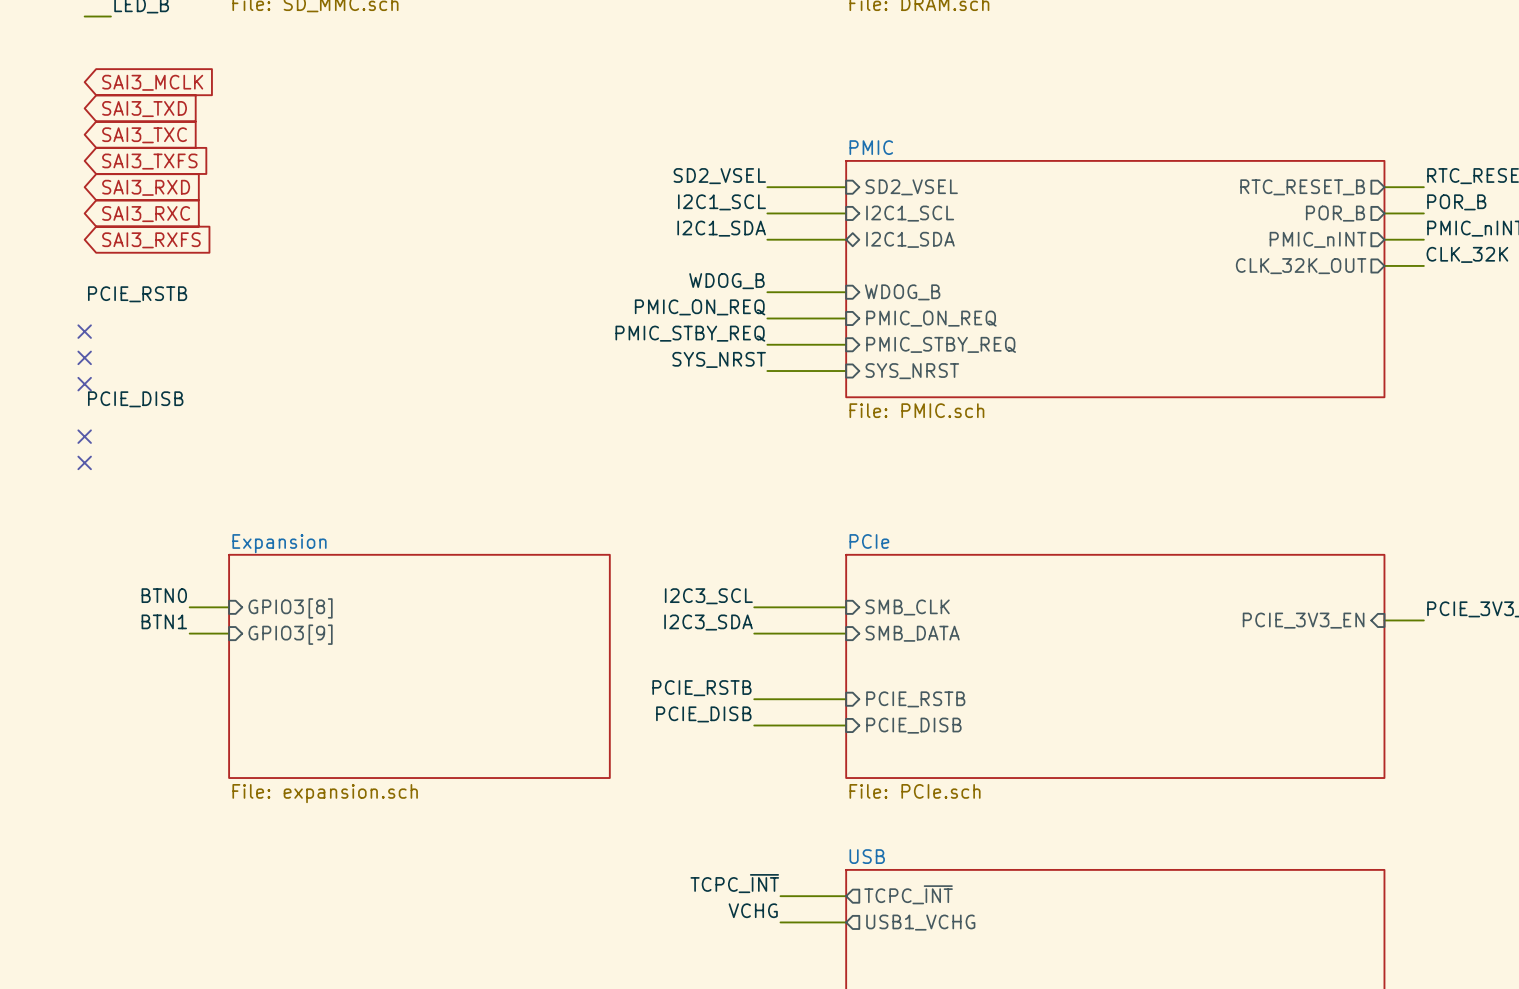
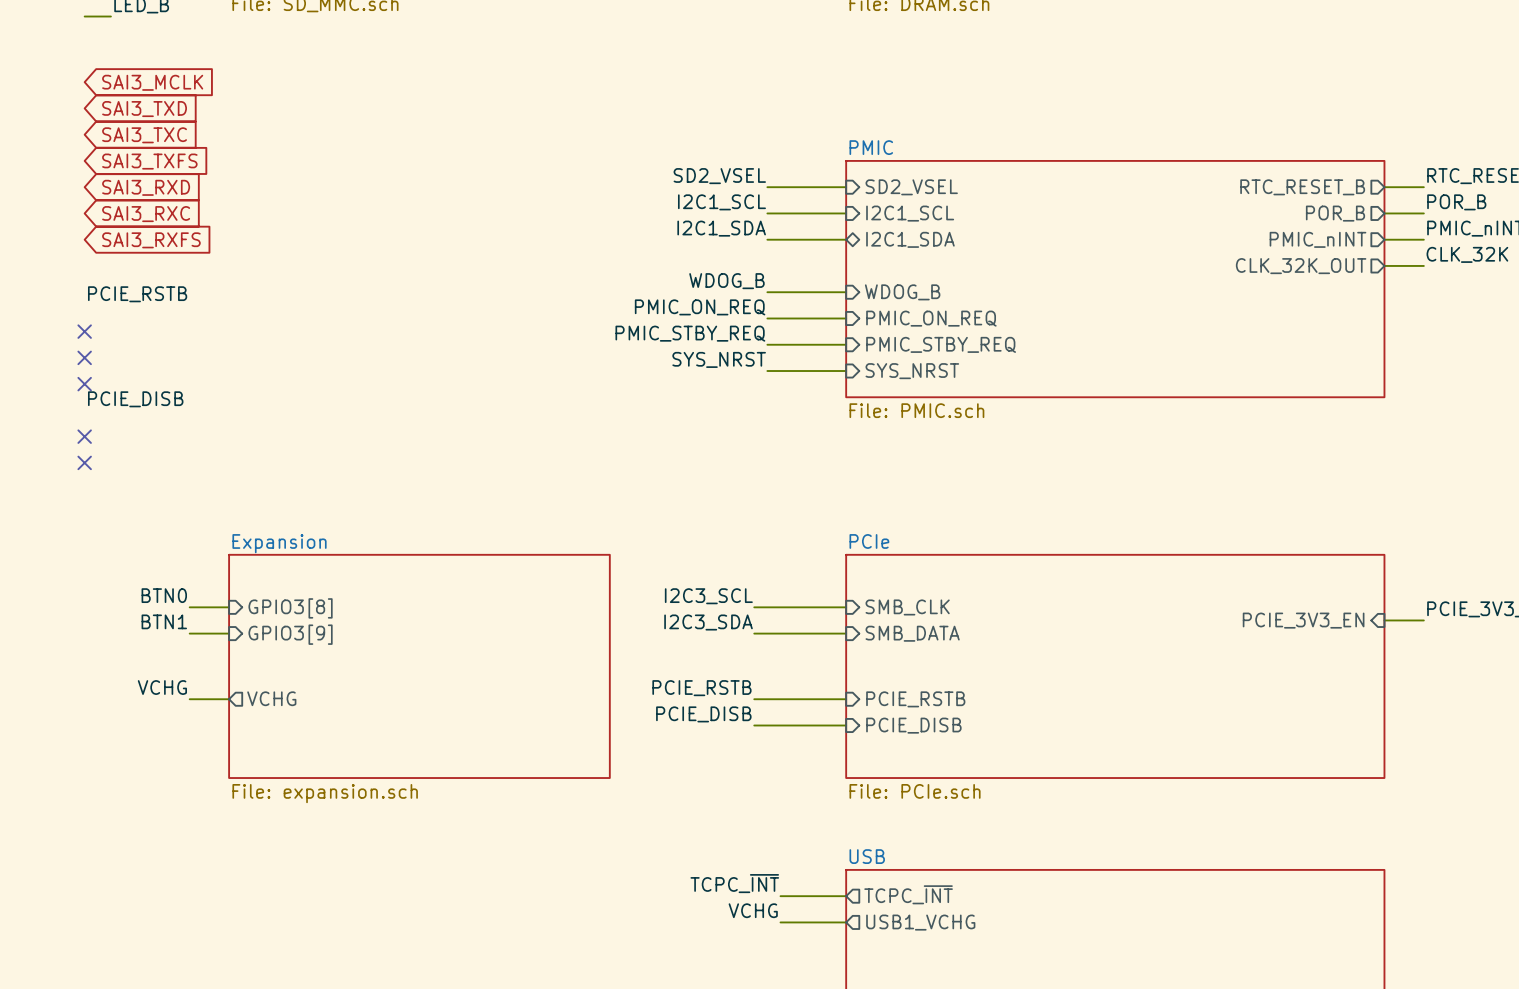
label: none -> VCHG (162, 687)
sheet pin: none -> VCHG (271, 698)
wire: none -> (189, 699) (229, 699)

